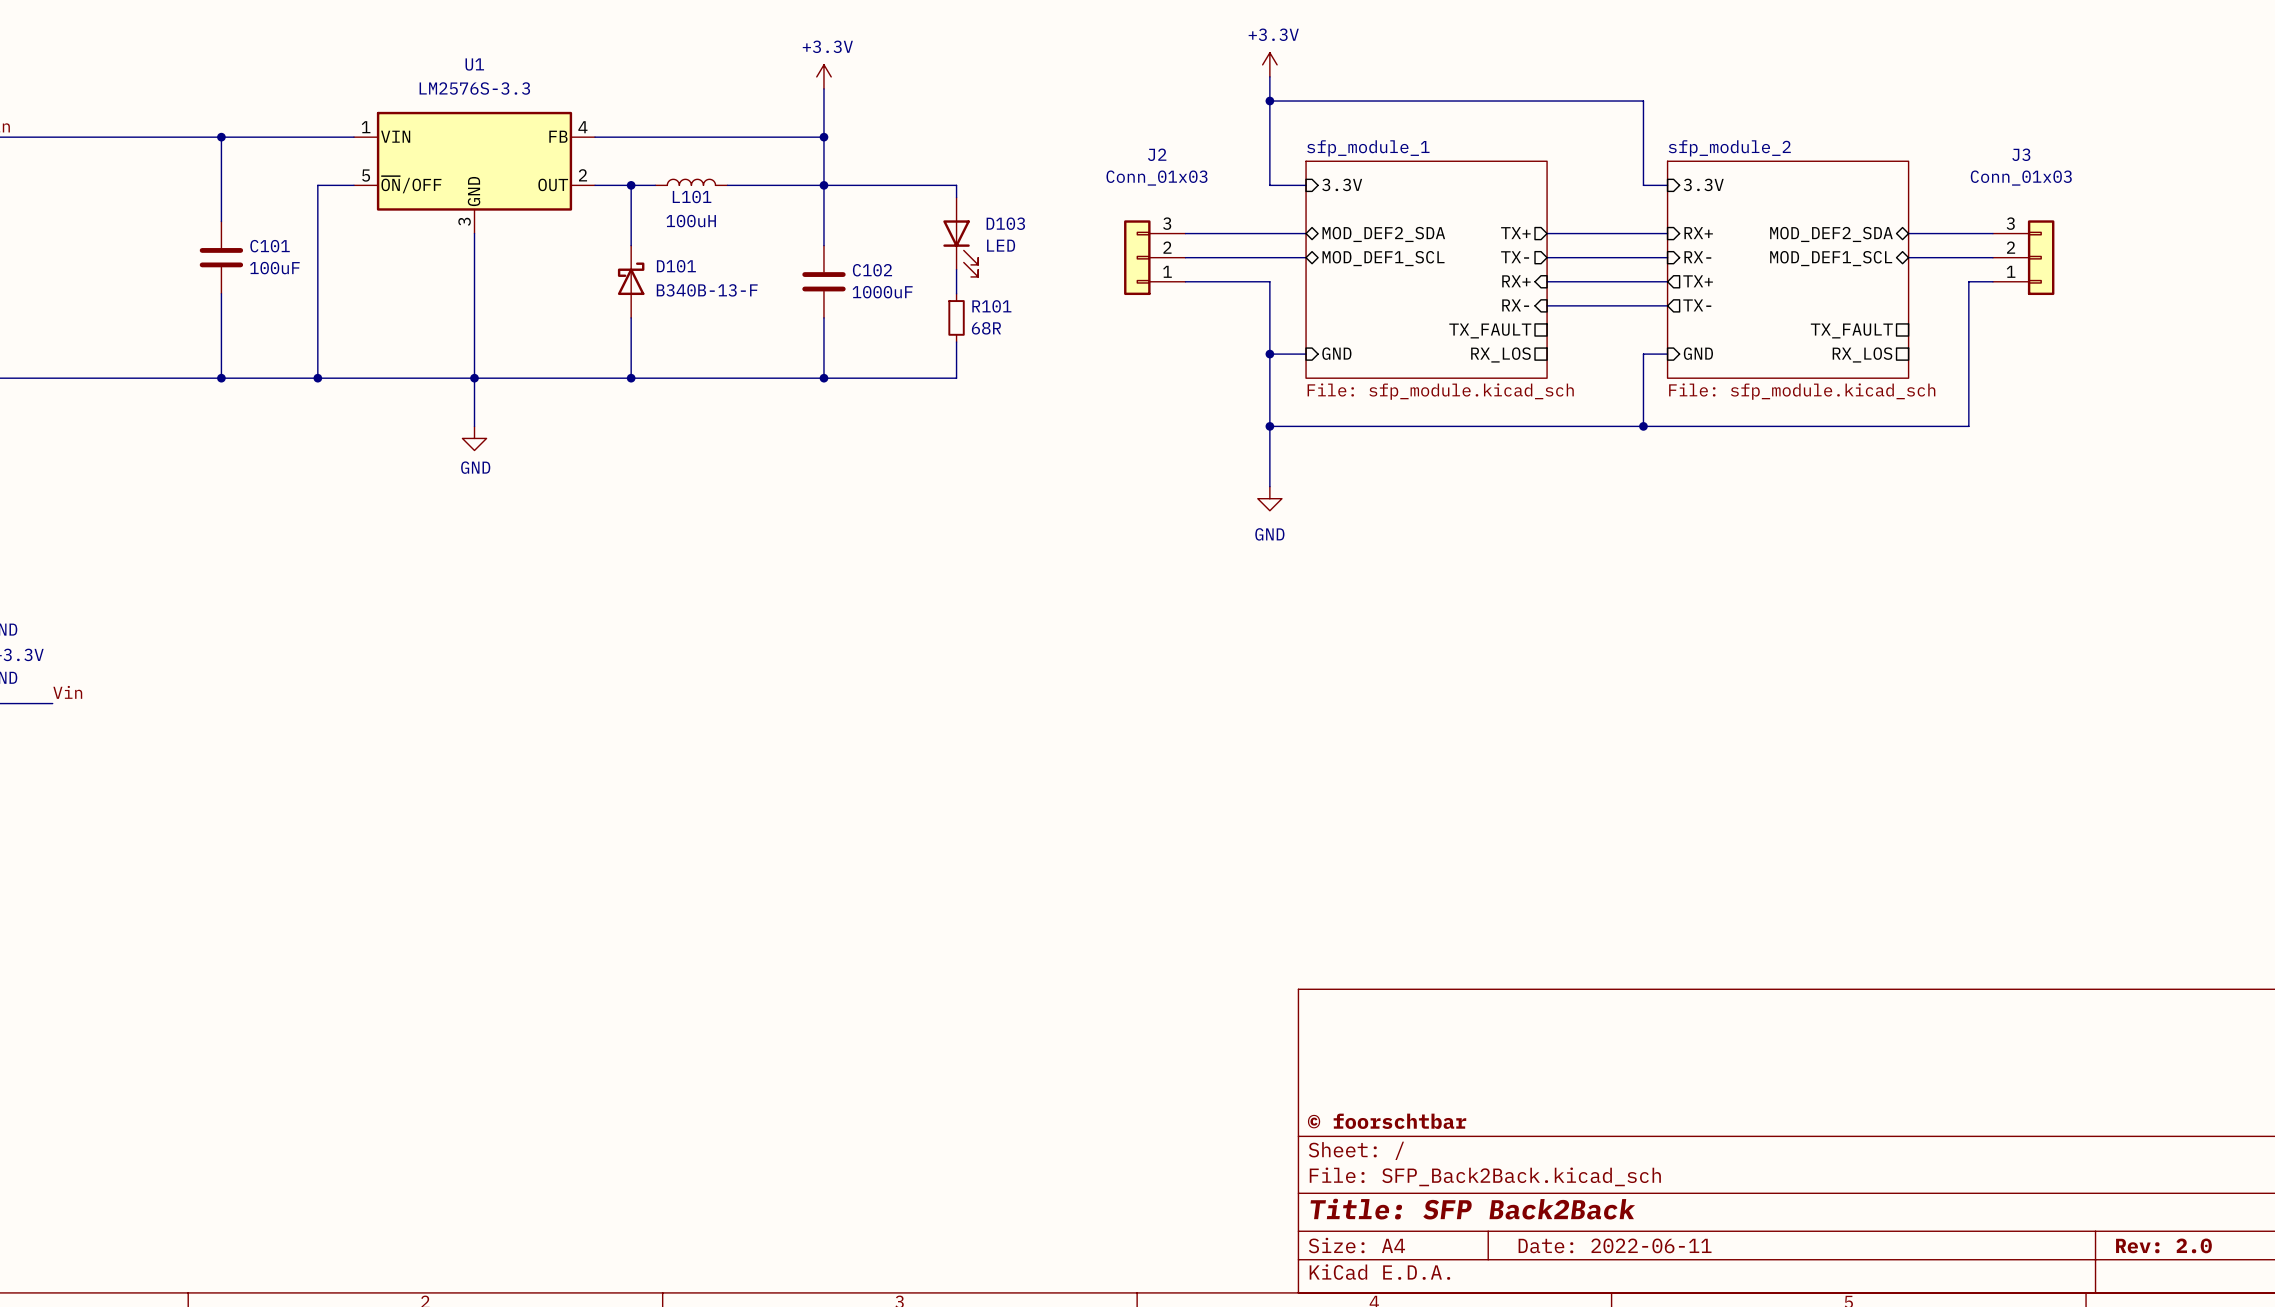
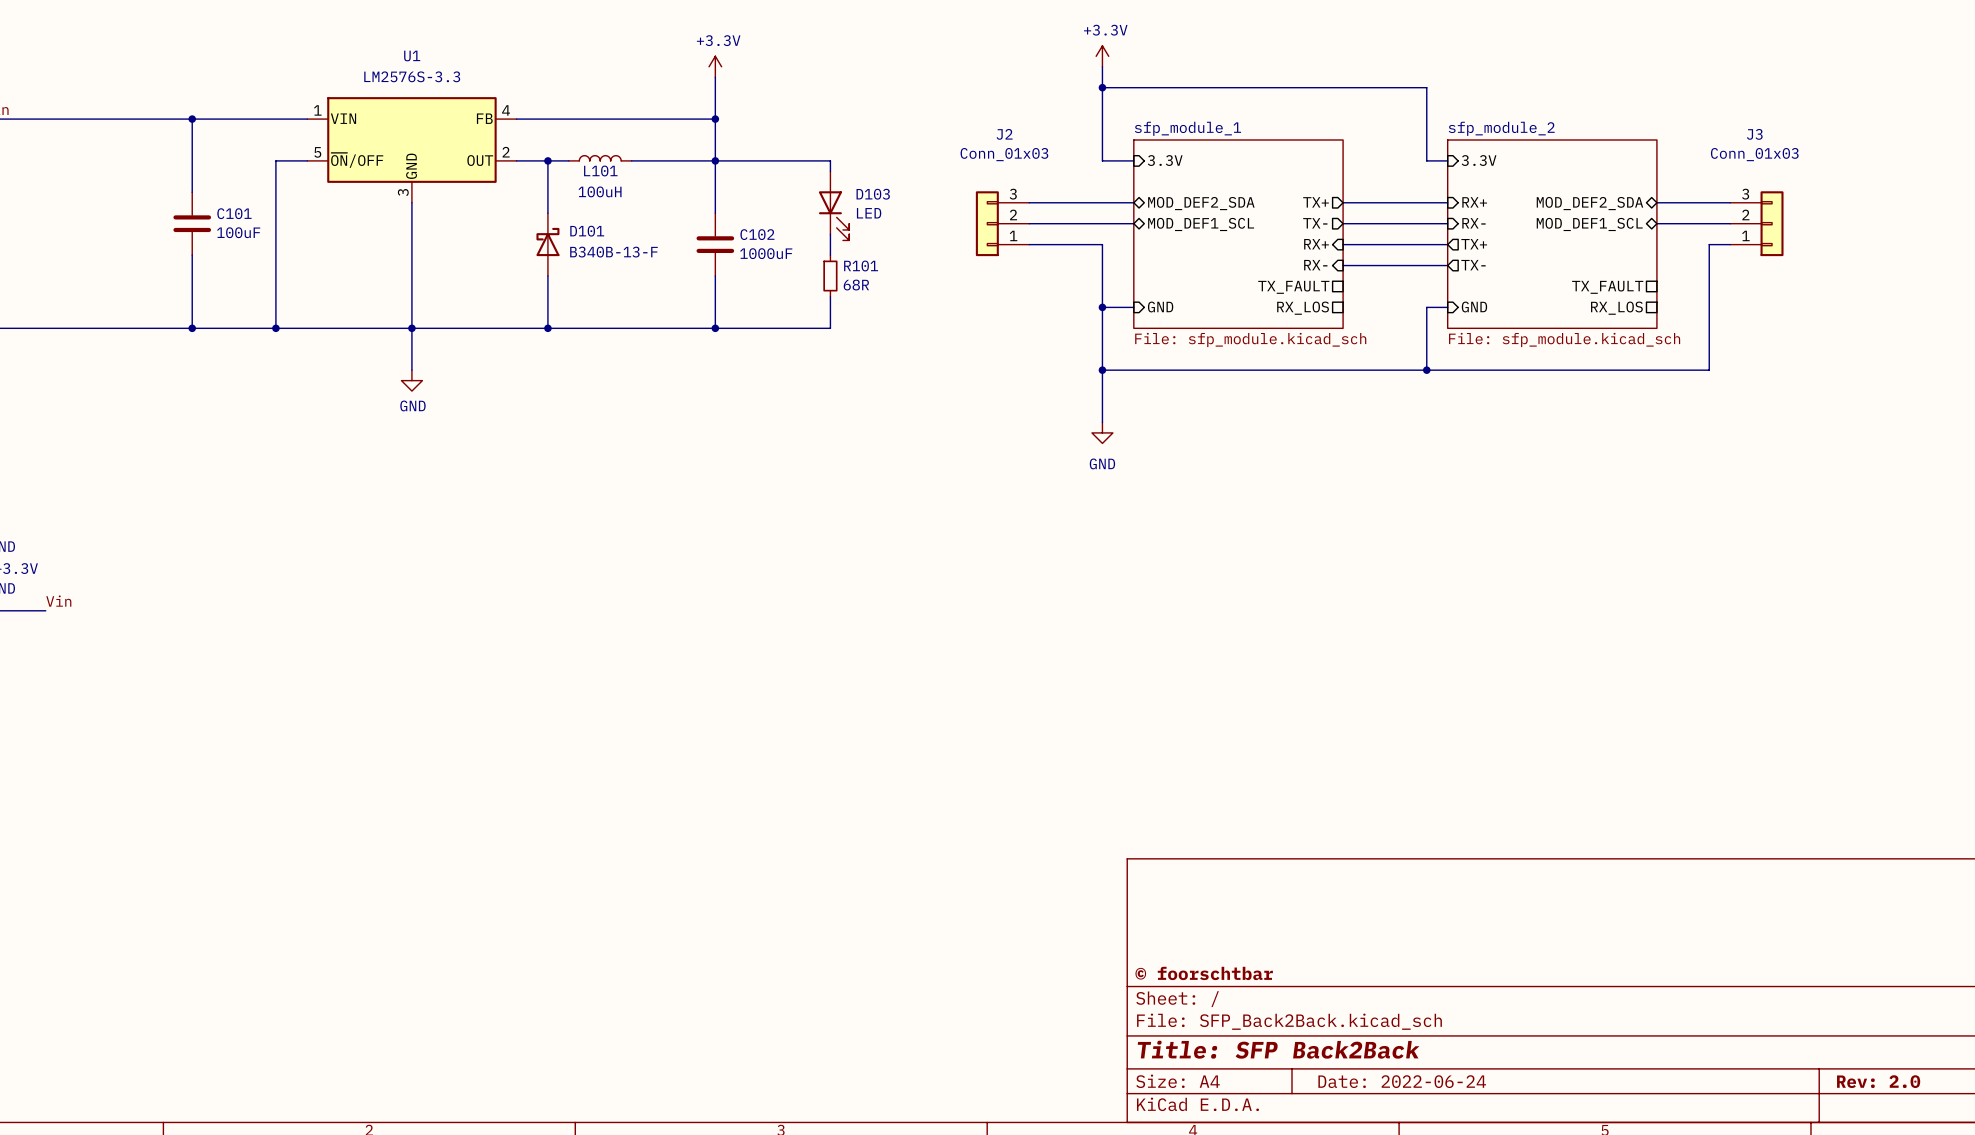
title block: Date: 2022-06-11 (1615, 1245) -> Date: 2022-06-24 (1402, 1081)

